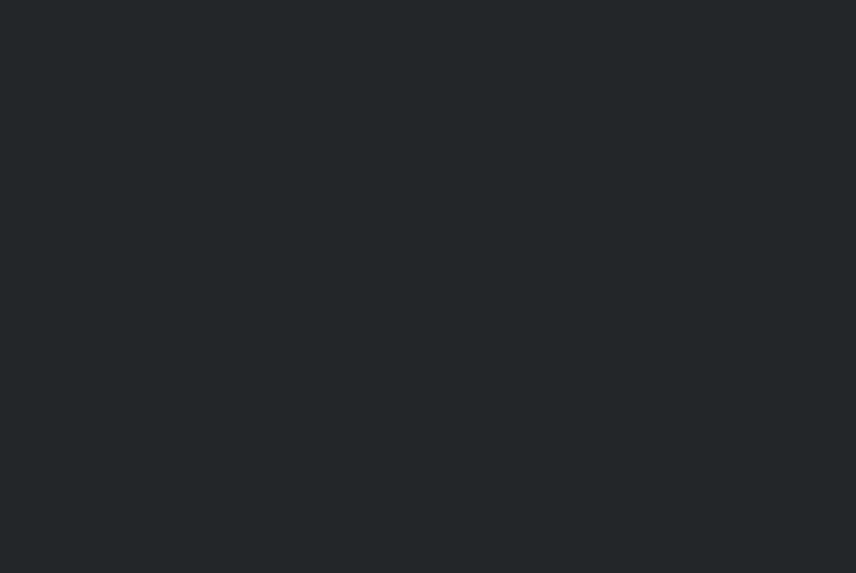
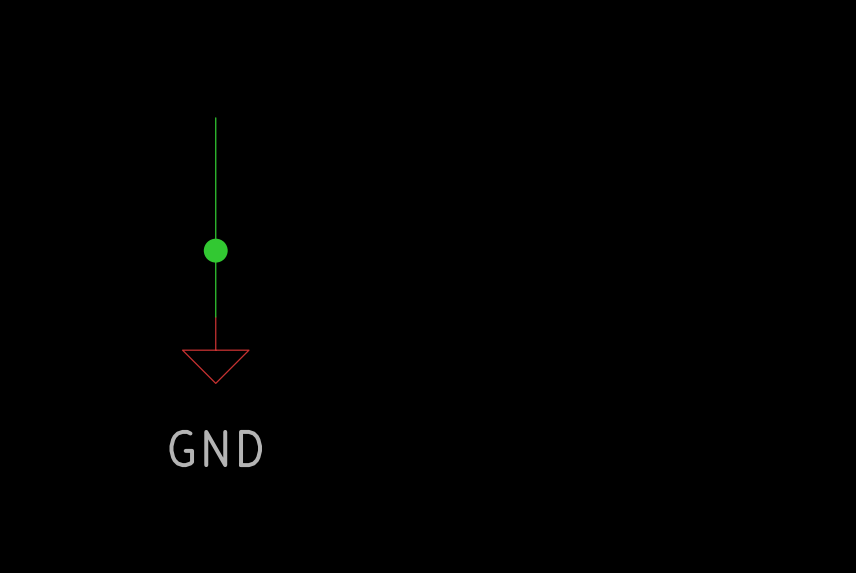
wire: none -> (215, 117) (215, 317)
junction: none -> (215, 250)
power symbol: none -> GND (215, 350)

